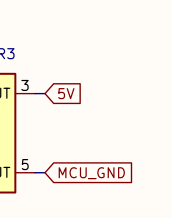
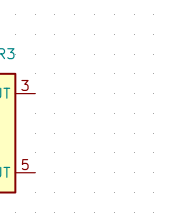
wire: (35, 93) (45, 93) -> none
global label: 5V (66, 93) -> none
wire: (35, 172) (45, 172) -> none
global label: MCU_GND (91, 173) -> none

